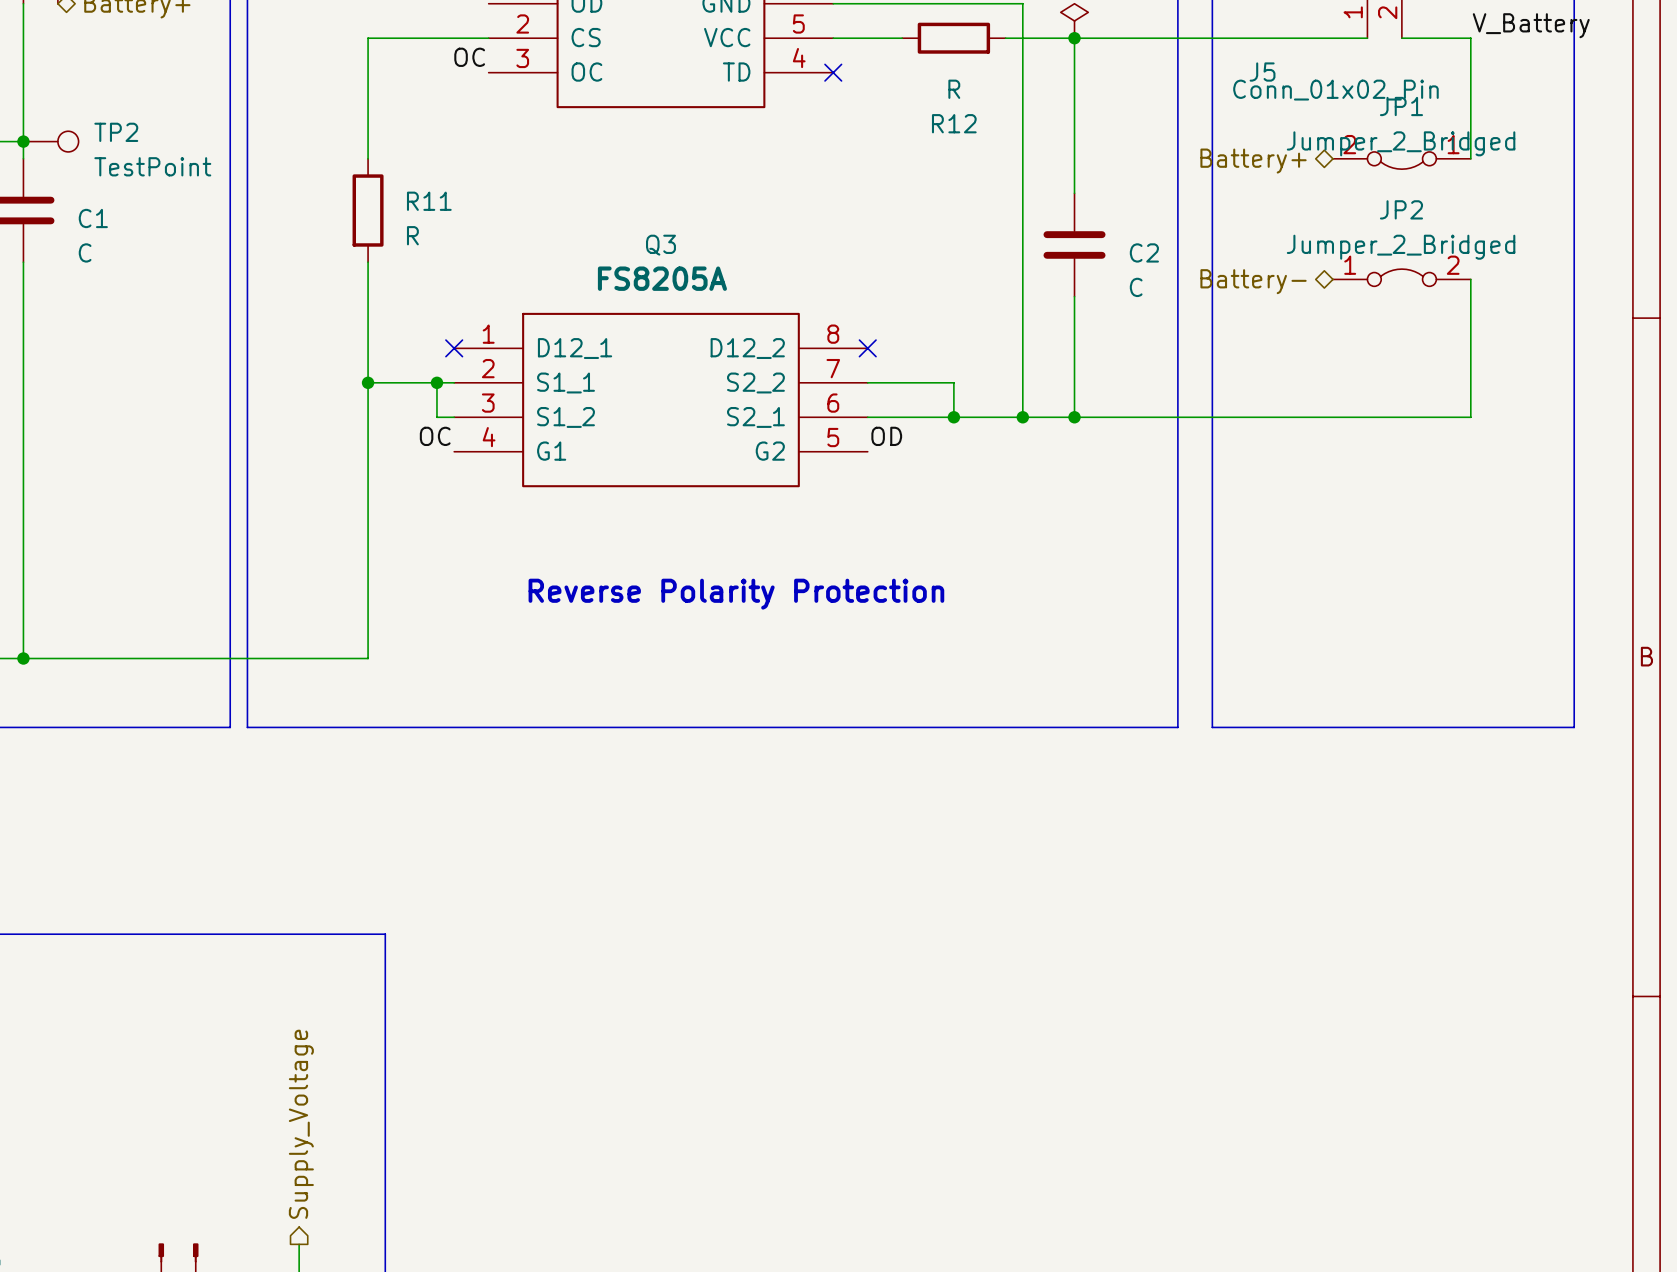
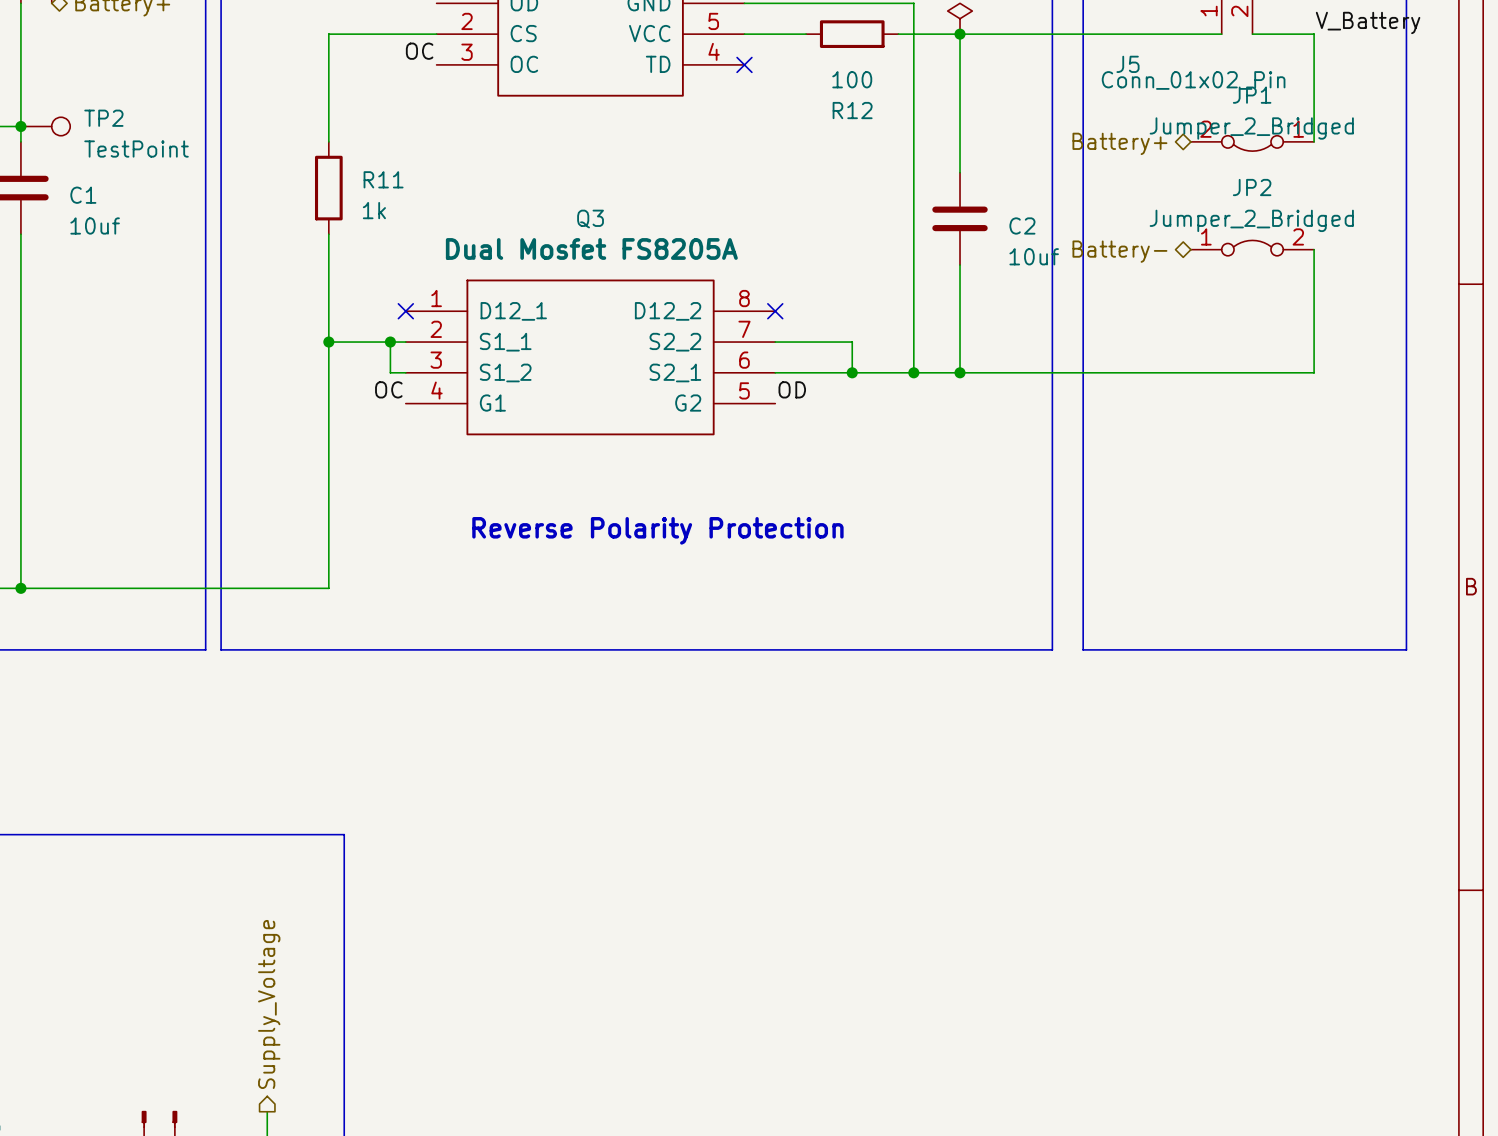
R12 value: R (954, 89) -> 100 (852, 79)
R11 value: R (412, 235) -> 1k (374, 210)
C1 value: C (85, 252) -> 10uf (95, 225)
Q3 value: FS8205A (662, 278) -> Dual Mosfet FS8205A (591, 248)
C2 value: C (1136, 287) -> 10uf (1034, 256)

